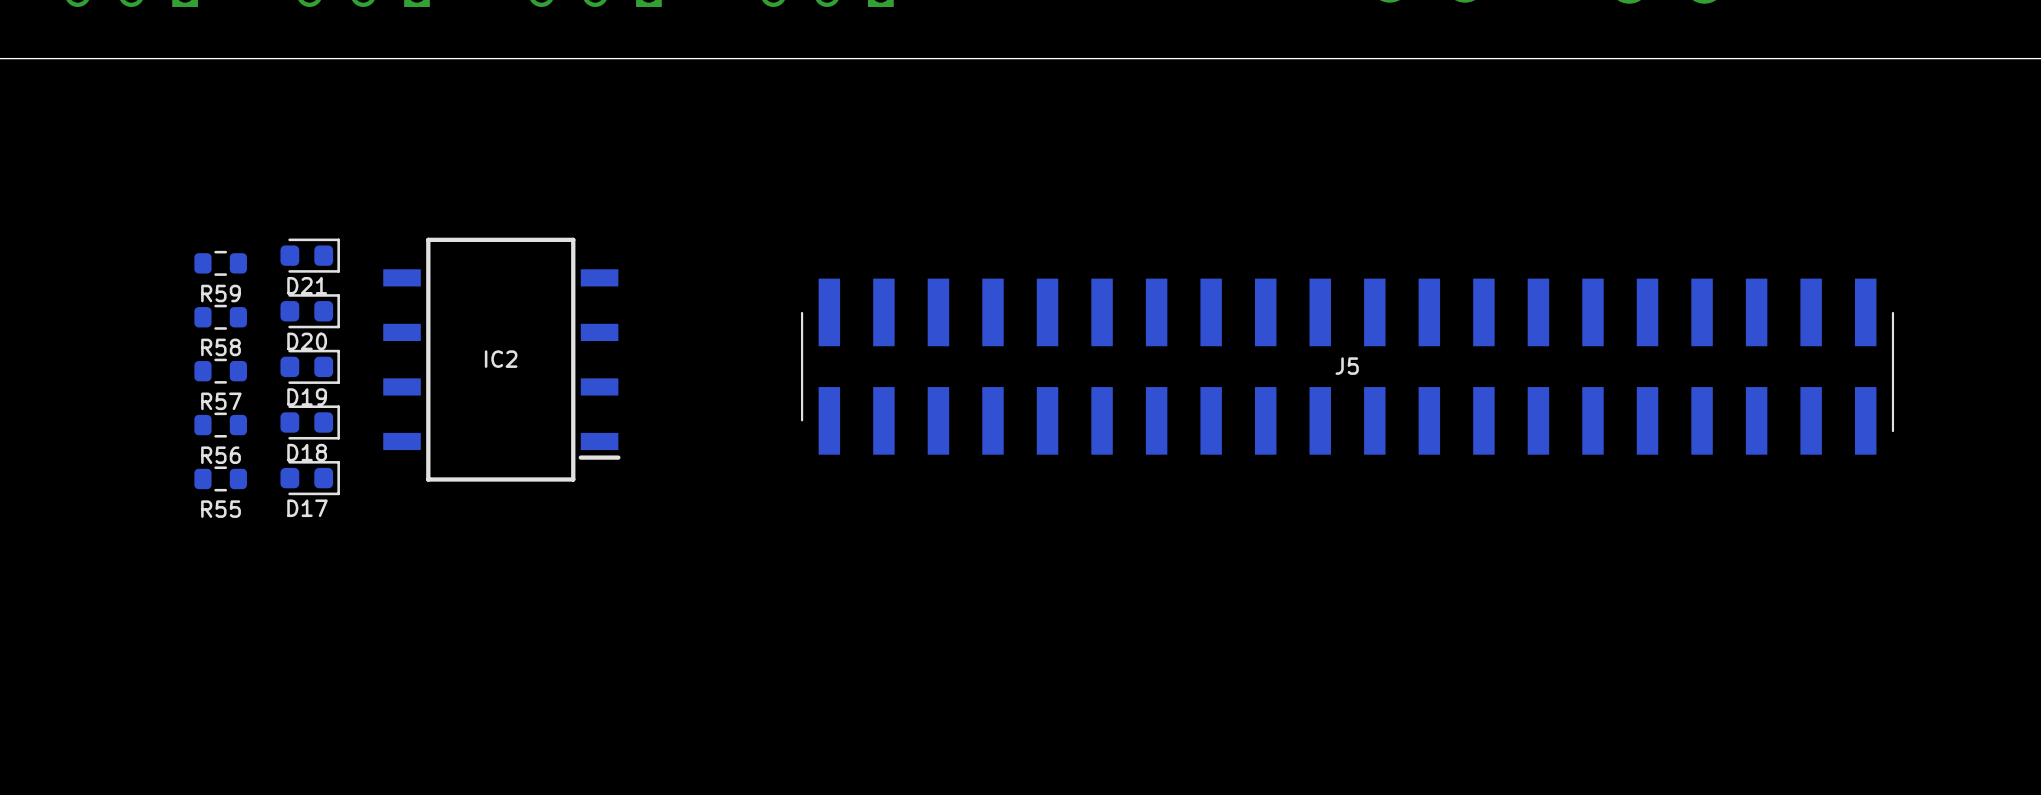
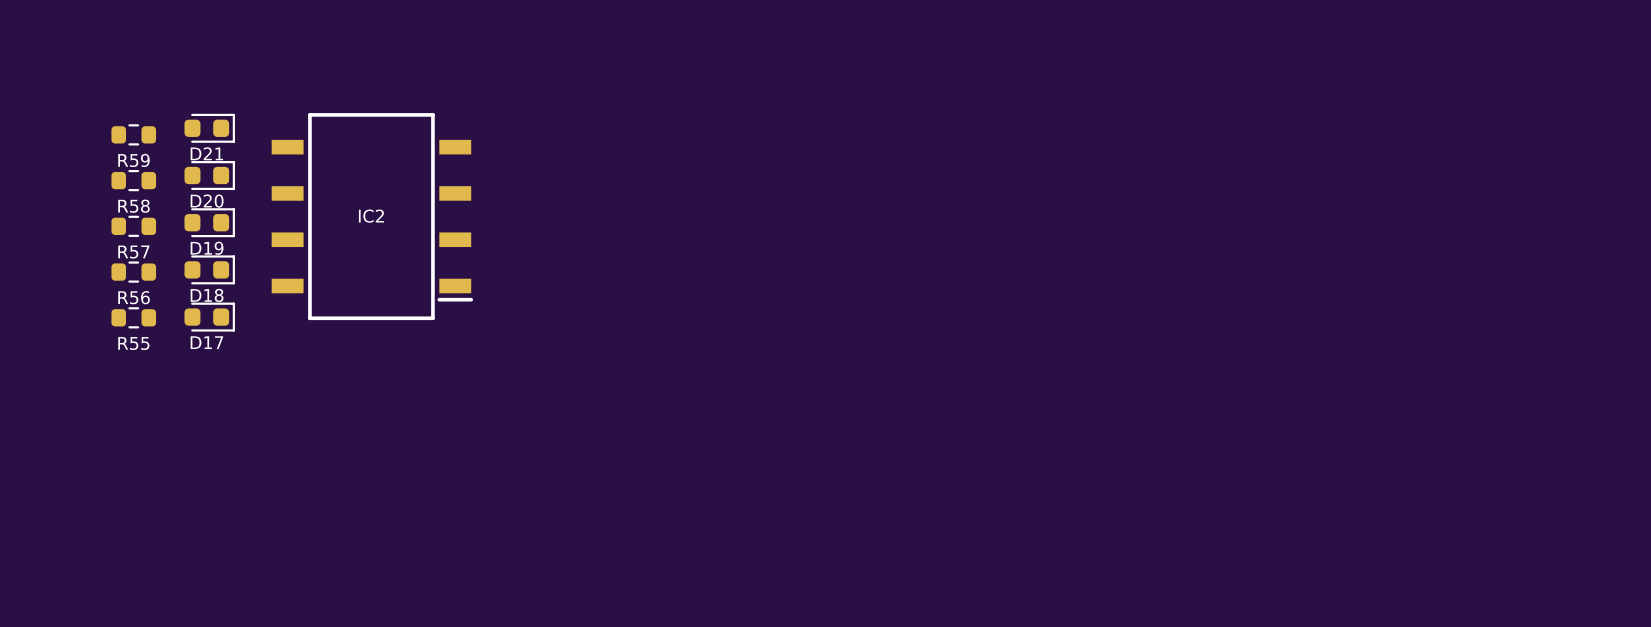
J5: (1347, 366) -> none

